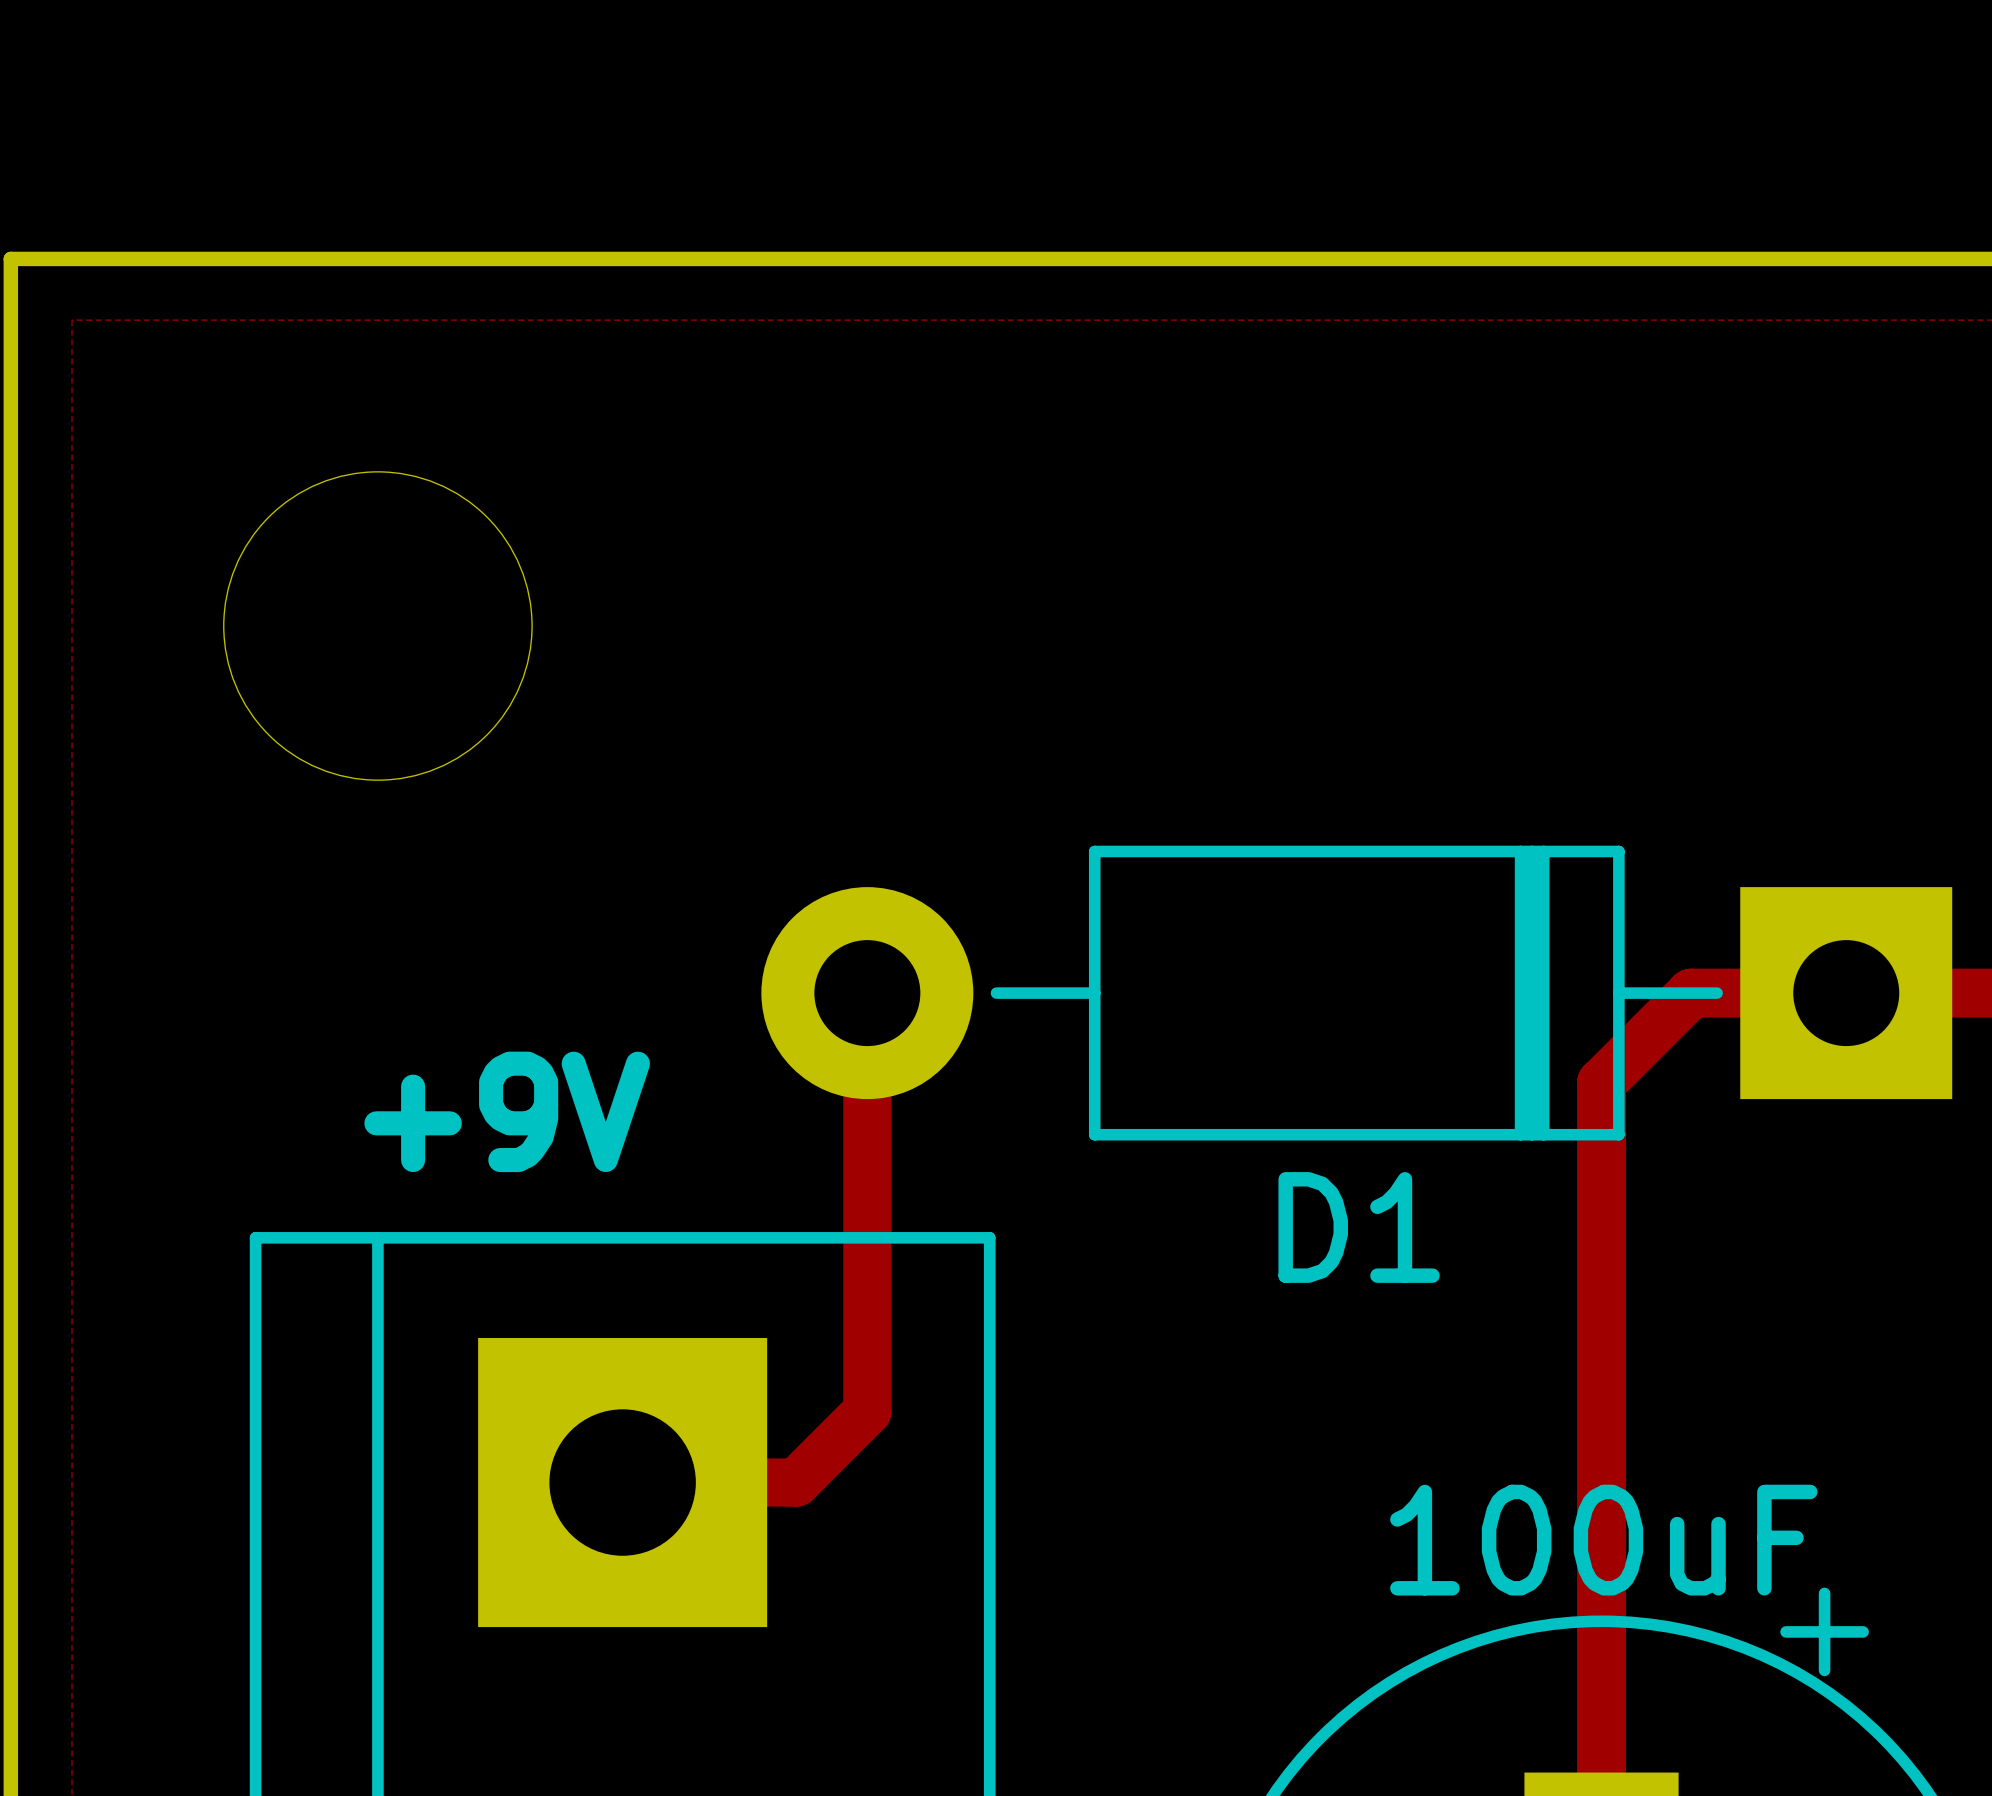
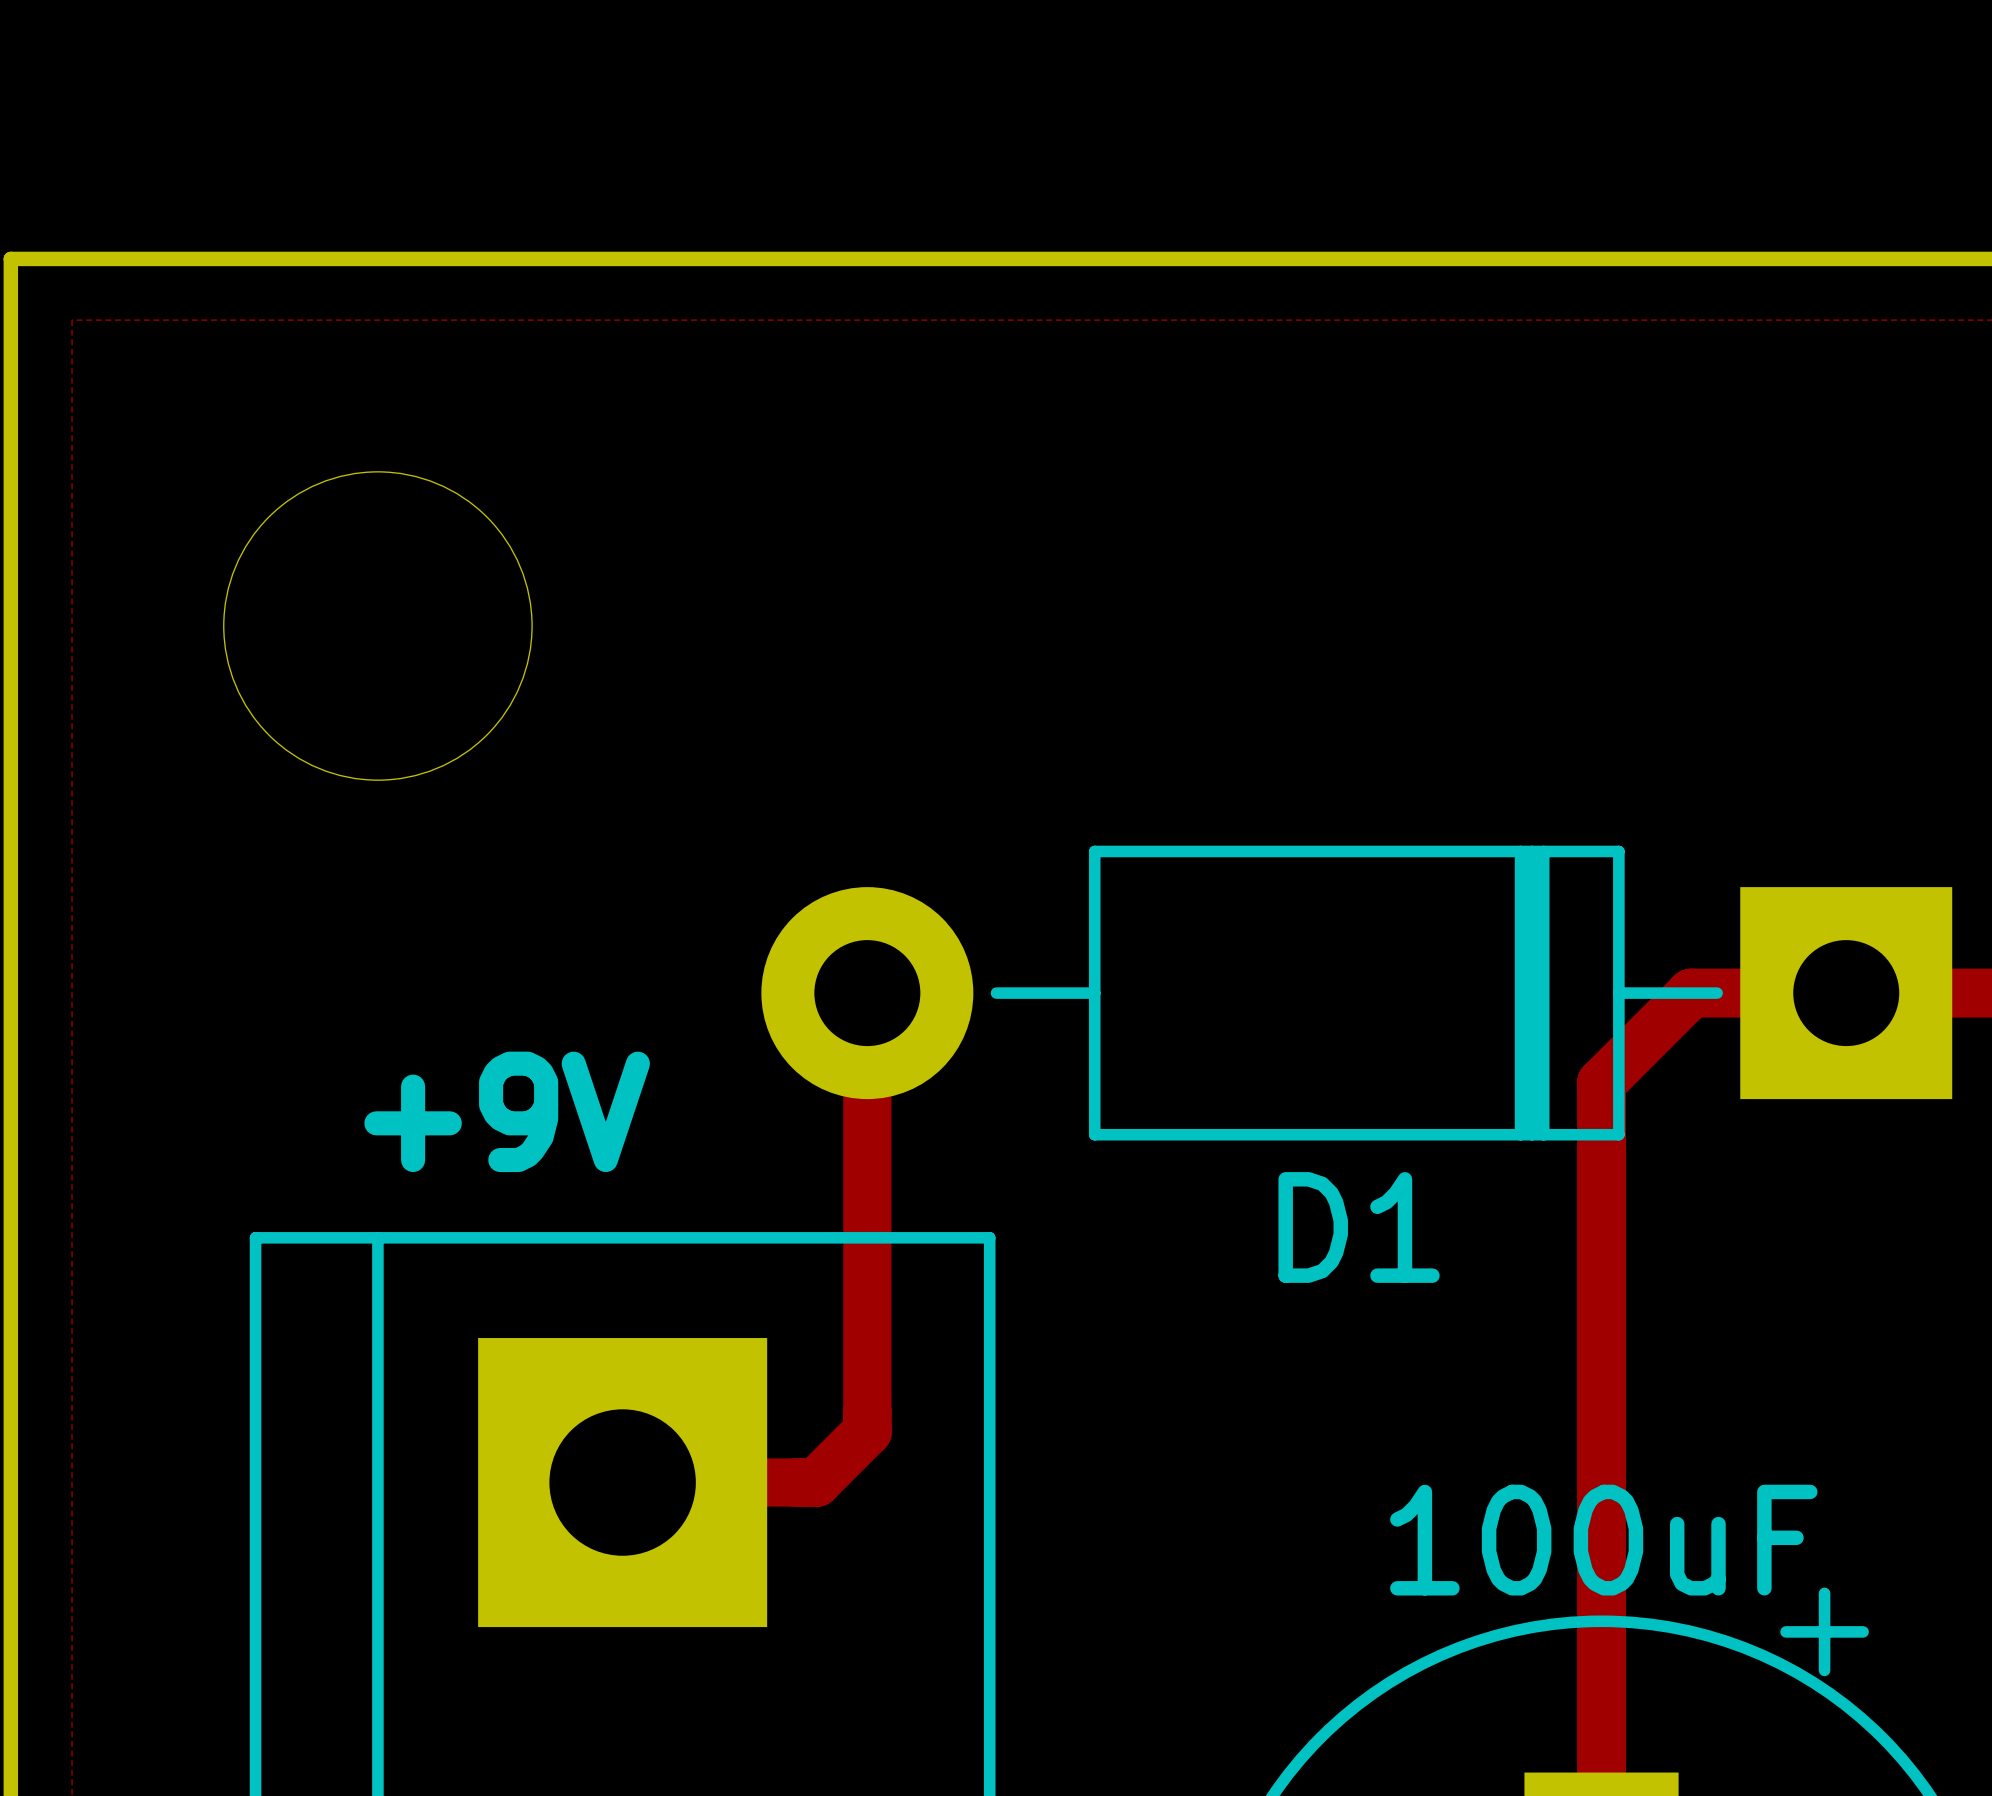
top track: (867, 1411) (796, 1482) -> (867, 1411) (867, 1431) (816, 1482) (796, 1482)

